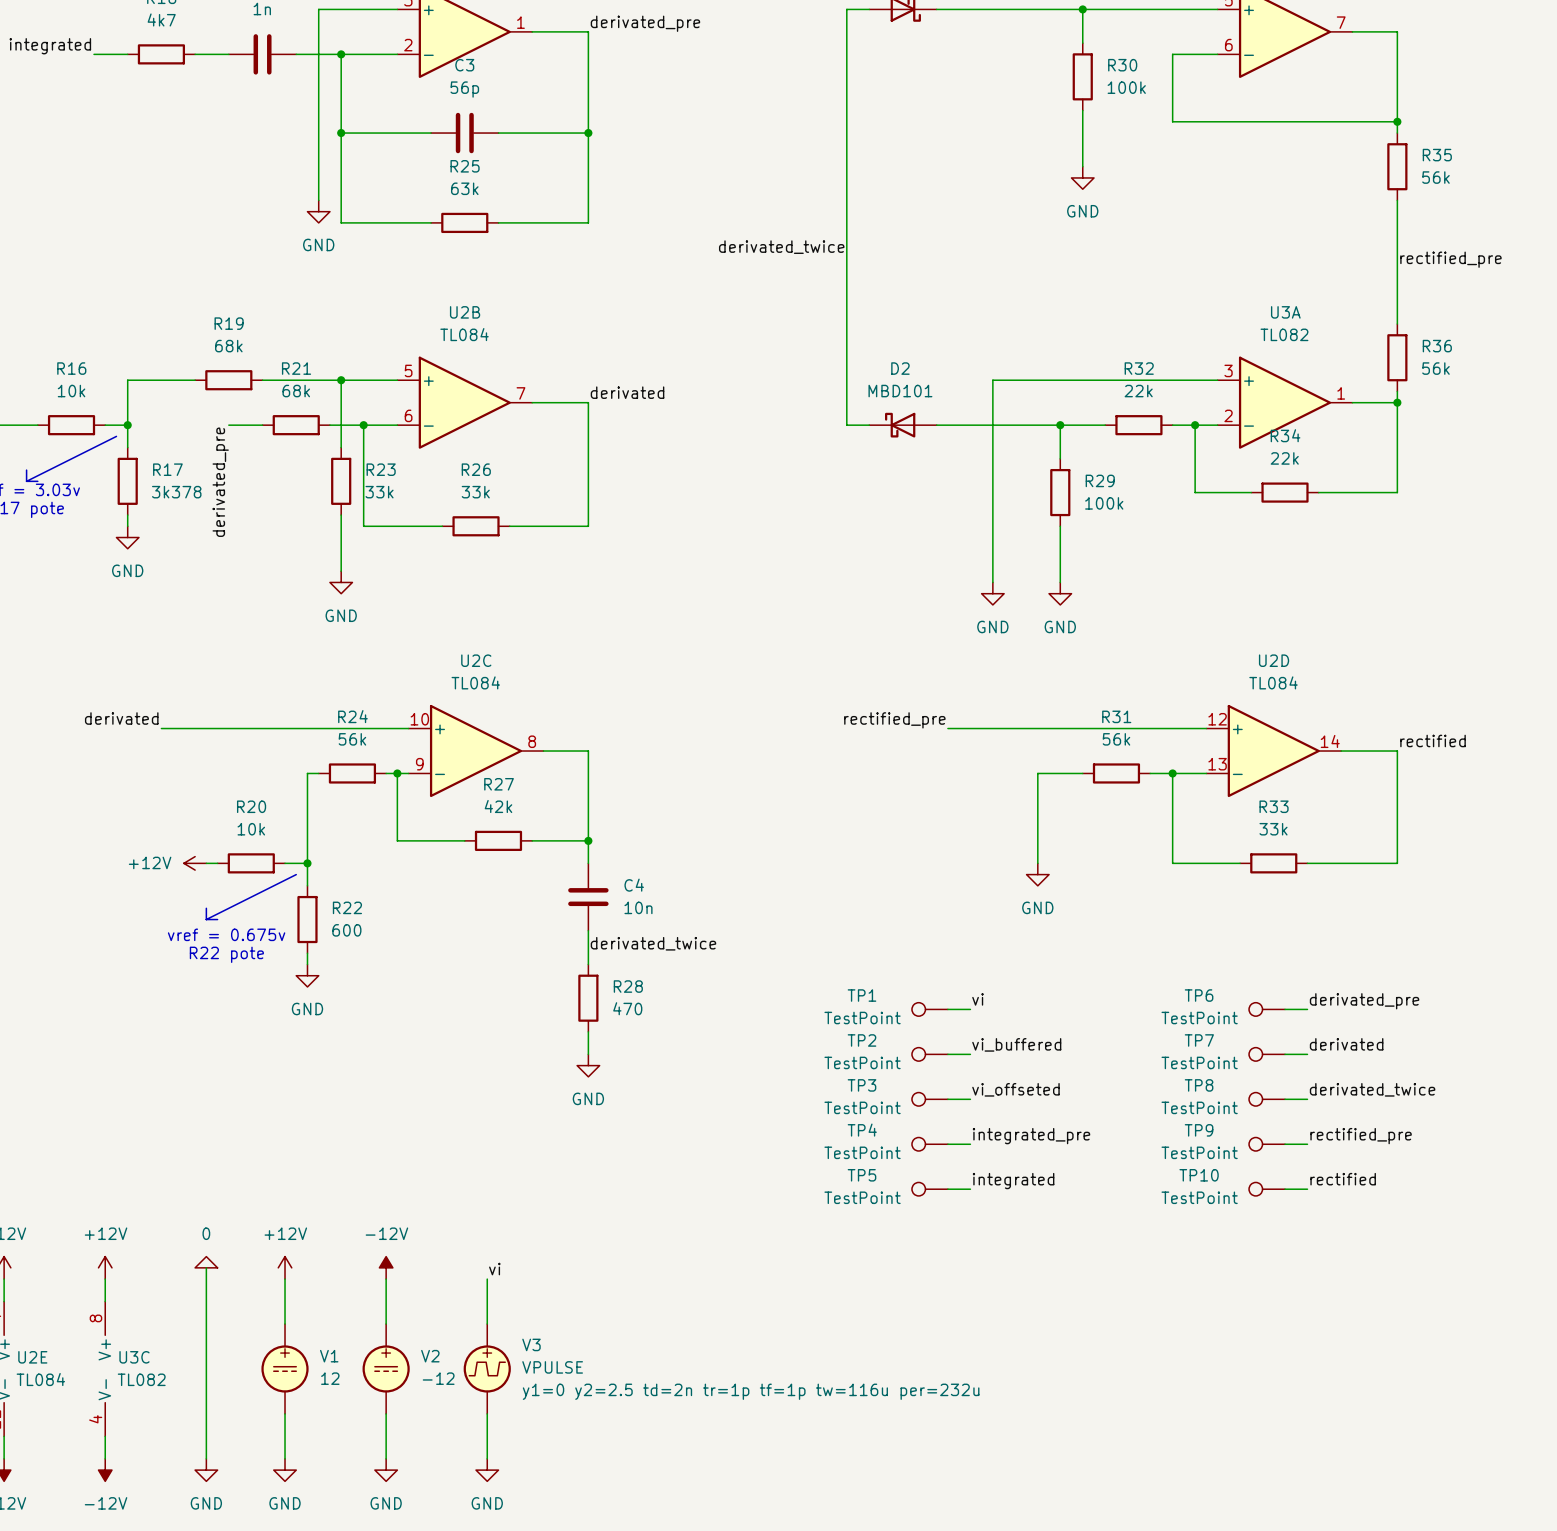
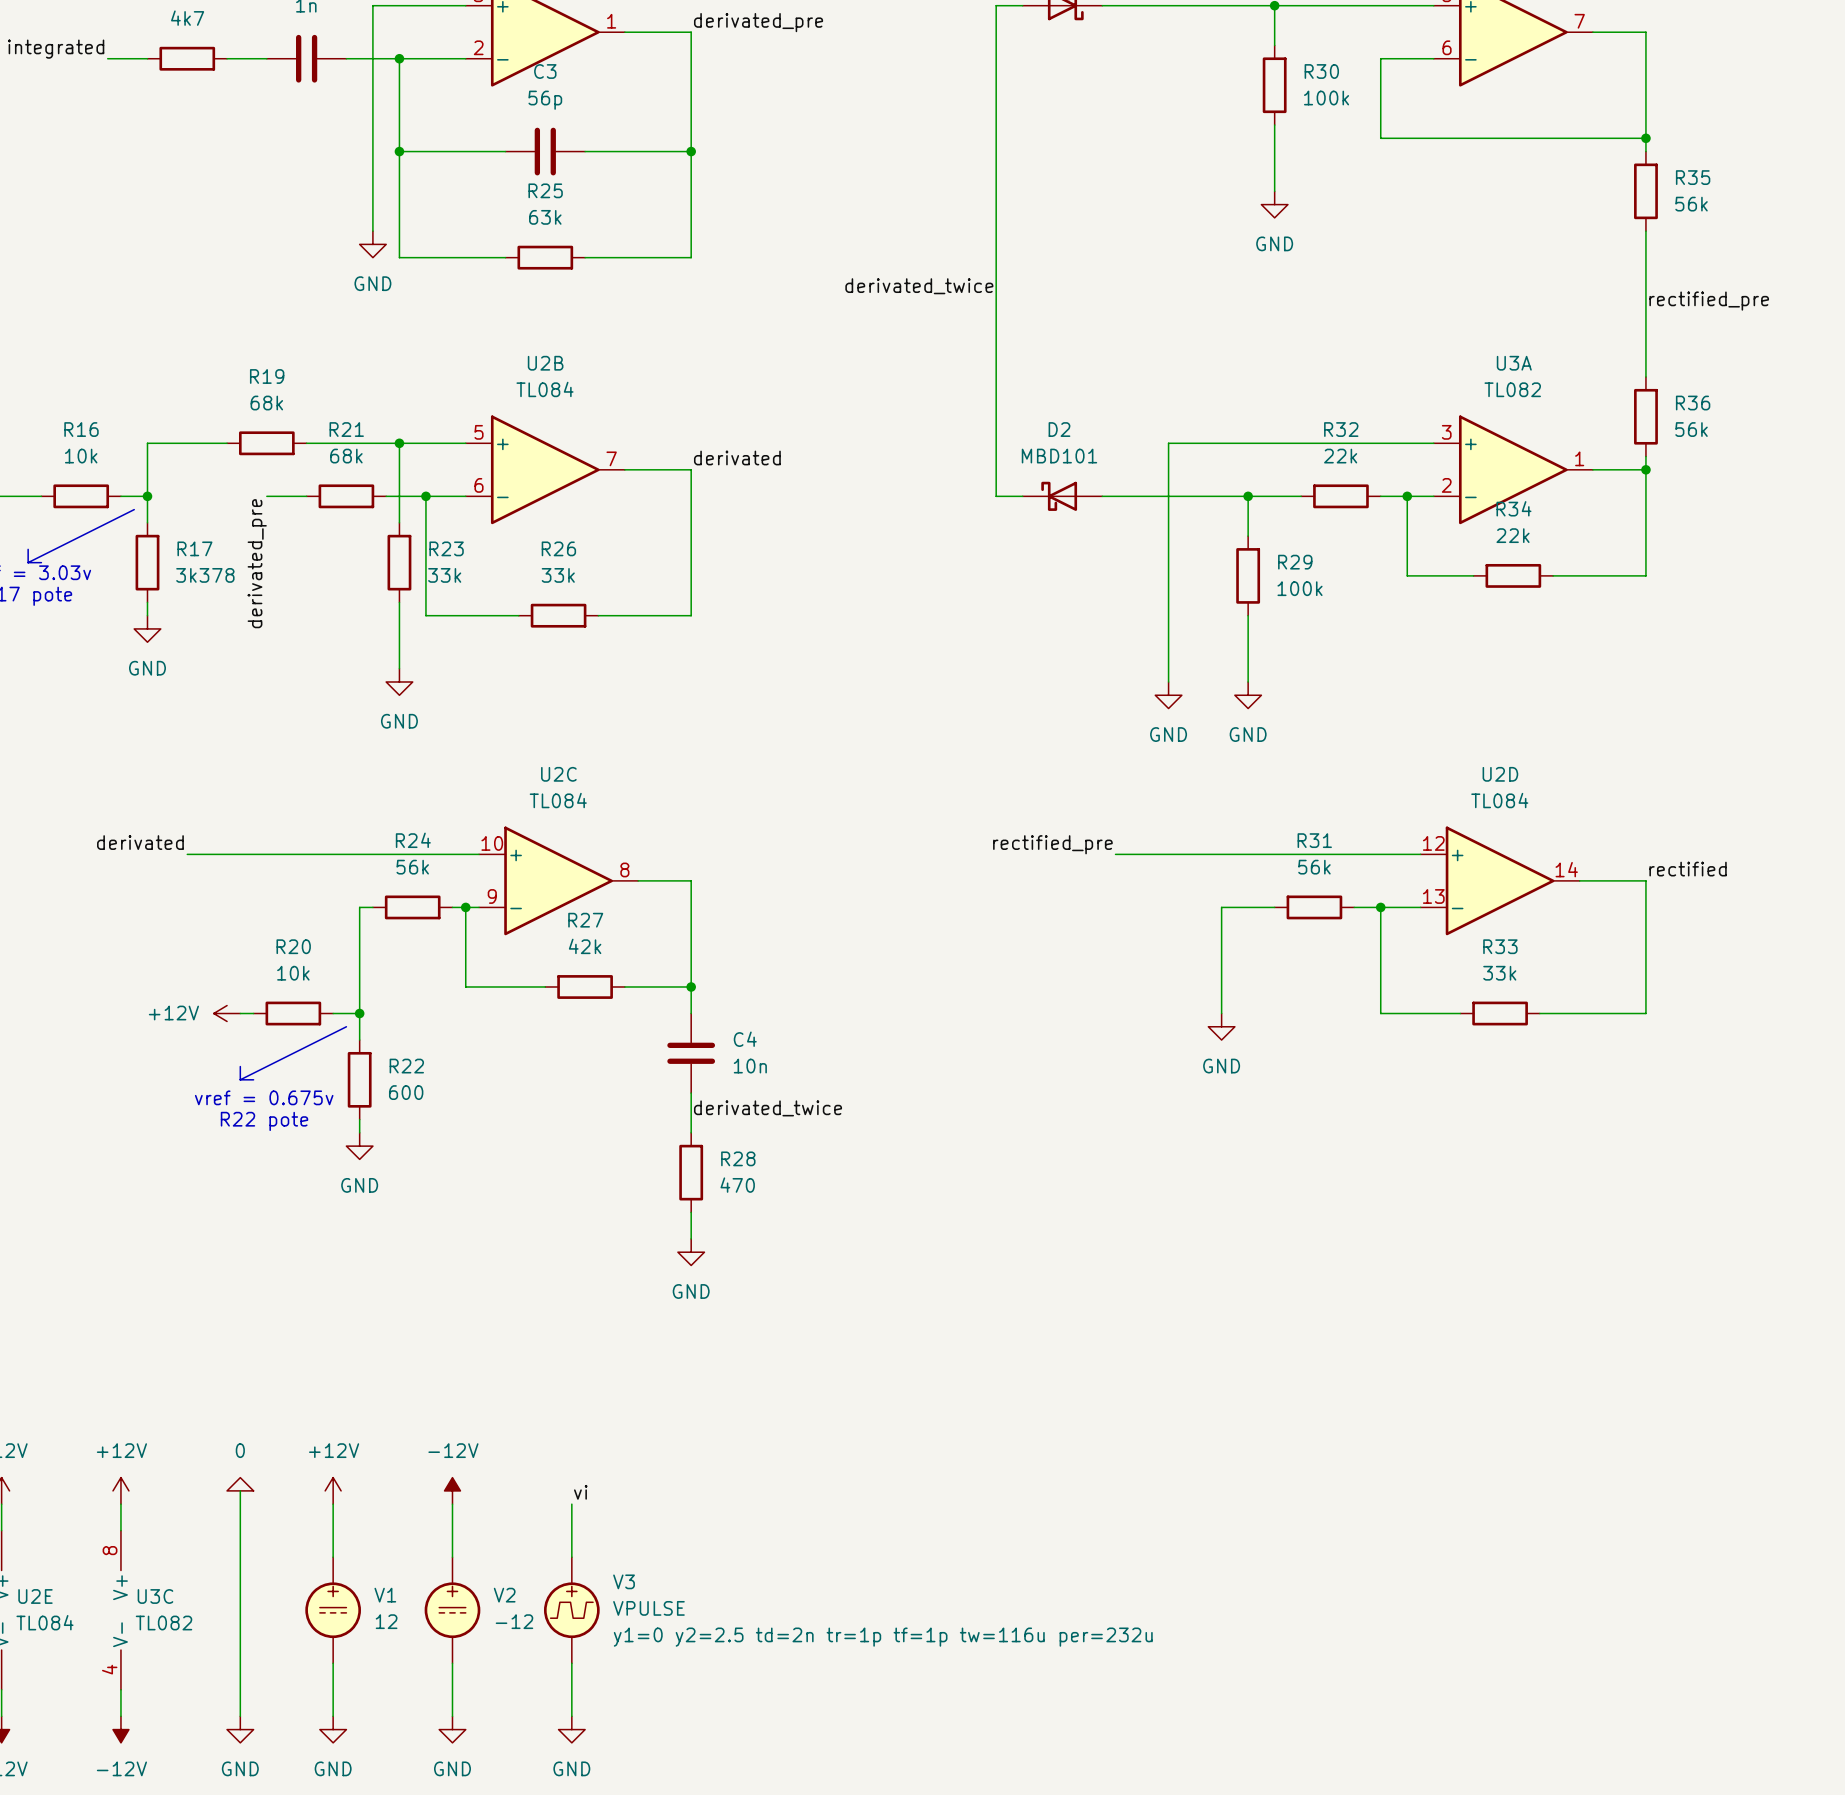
label: vi (977, 999) -> none
label: derivated_pre (1364, 1001) -> none
TP1: TestPoint (929, 1009) -> none
wire: (947, 1009) (970, 1009) -> none
TP6: TestPoint (1267, 1009) -> none
wire: (1285, 1009) (1307, 1009) -> none
label: vi_buffered (1016, 1044) -> none
label: derivated (1346, 1044) -> none
TP2: TestPoint (929, 1054) -> none
wire: (947, 1054) (970, 1054) -> none
TP7: TestPoint (1267, 1054) -> none
wire: (1285, 1054) (1307, 1054) -> none
label: vi_offseted (1015, 1089) -> none
label: derivated_twice (1372, 1089) -> none
TP3: TestPoint (929, 1099) -> none
wire: (947, 1099) (970, 1099) -> none
TP8: TestPoint (1267, 1099) -> none
wire: (1285, 1099) (1307, 1099) -> none
label: integrated_pre (1031, 1136) -> none
label: rectified_pre (1361, 1136) -> none
TP4: TestPoint (929, 1144) -> none
wire: (947, 1144) (970, 1144) -> none
TP9: TestPoint (1267, 1144) -> none
wire: (1285, 1144) (1307, 1144) -> none
label: rectified (1343, 1179) -> none
label: integrated (1013, 1181) -> none
TP5: TestPoint (929, 1189) -> none
wire: (947, 1189) (970, 1189) -> none
TP10: TestPoint (1267, 1189) -> none
wire: (1285, 1189) (1307, 1189) -> none

